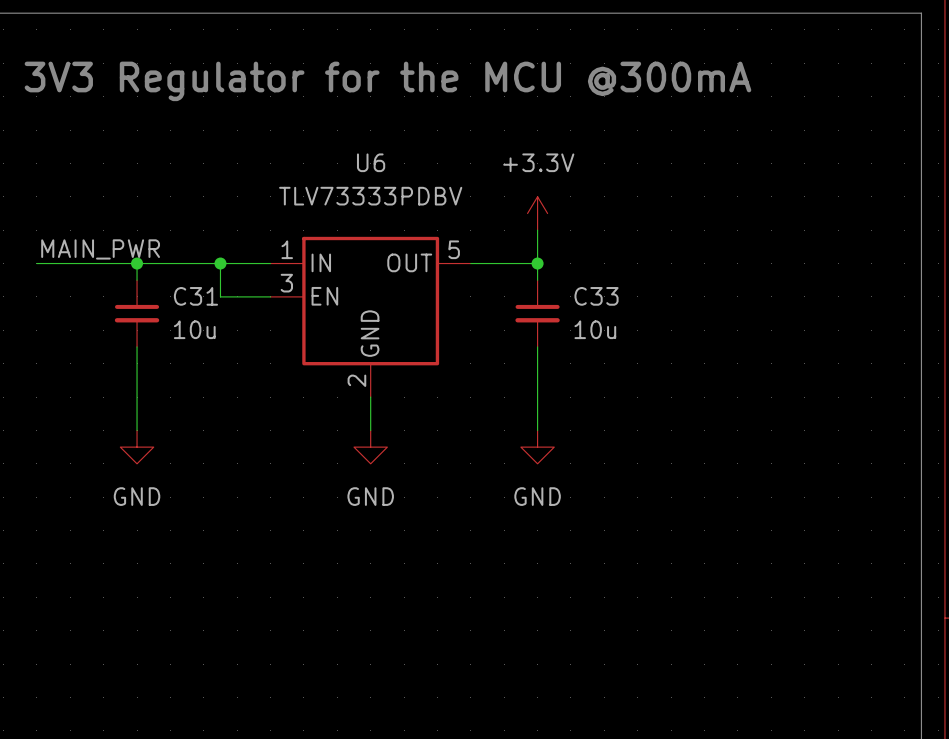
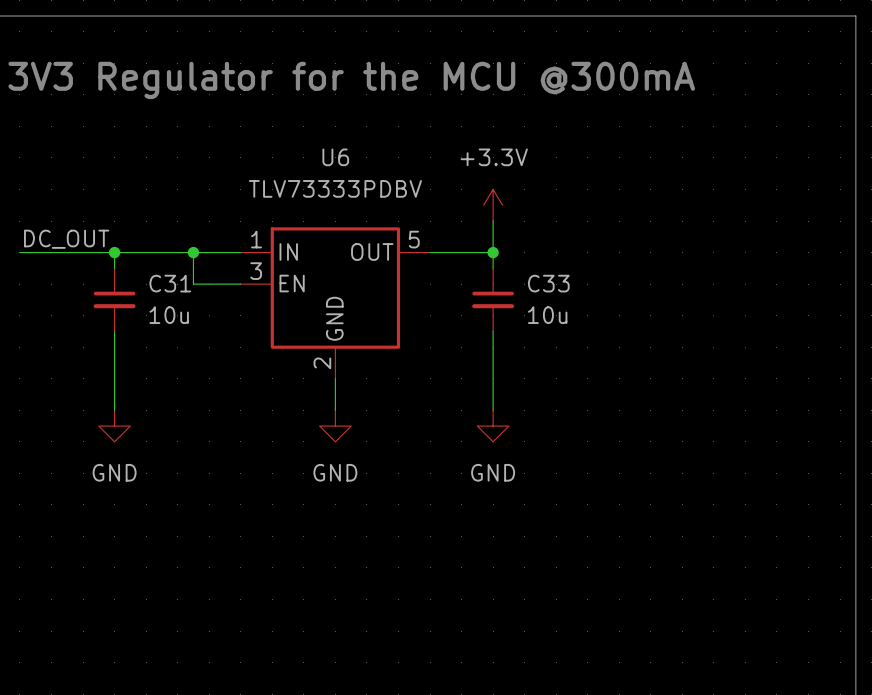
label: MAIN_PWR (100, 249) -> DC_OUT (66, 239)

